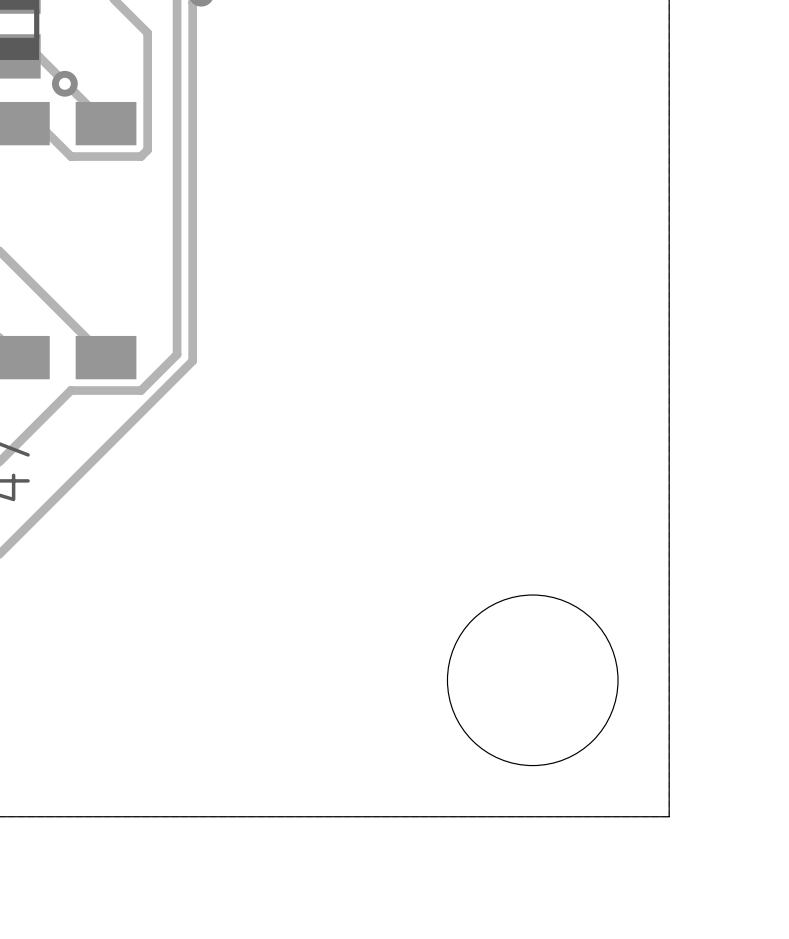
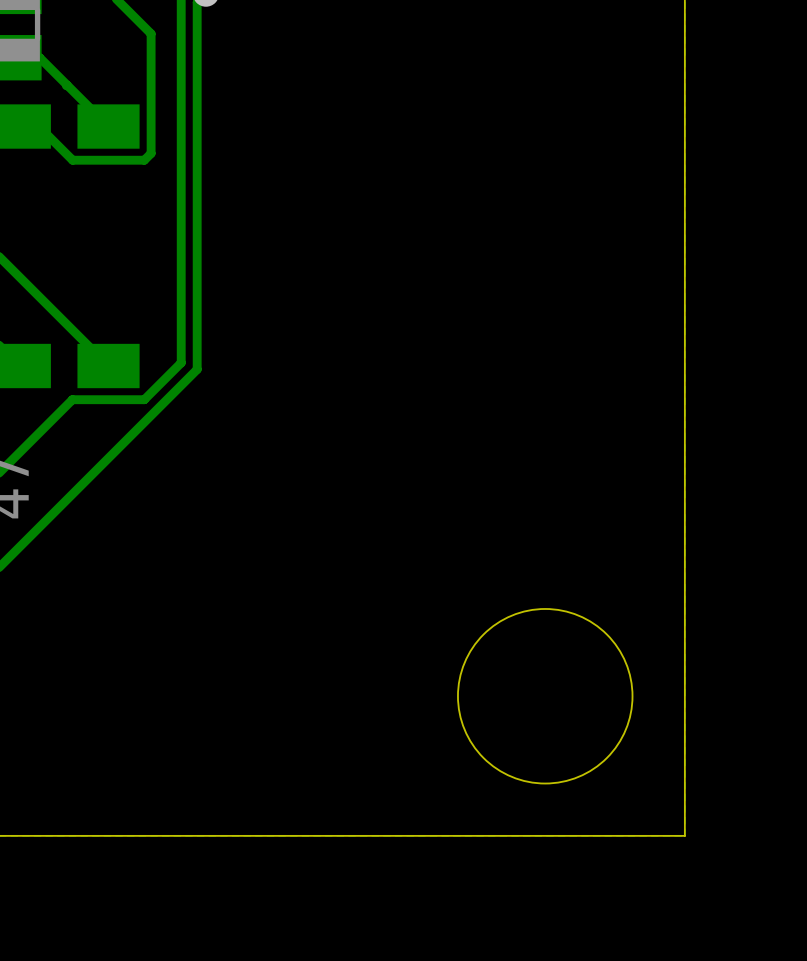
via: (64, 83) -> none

